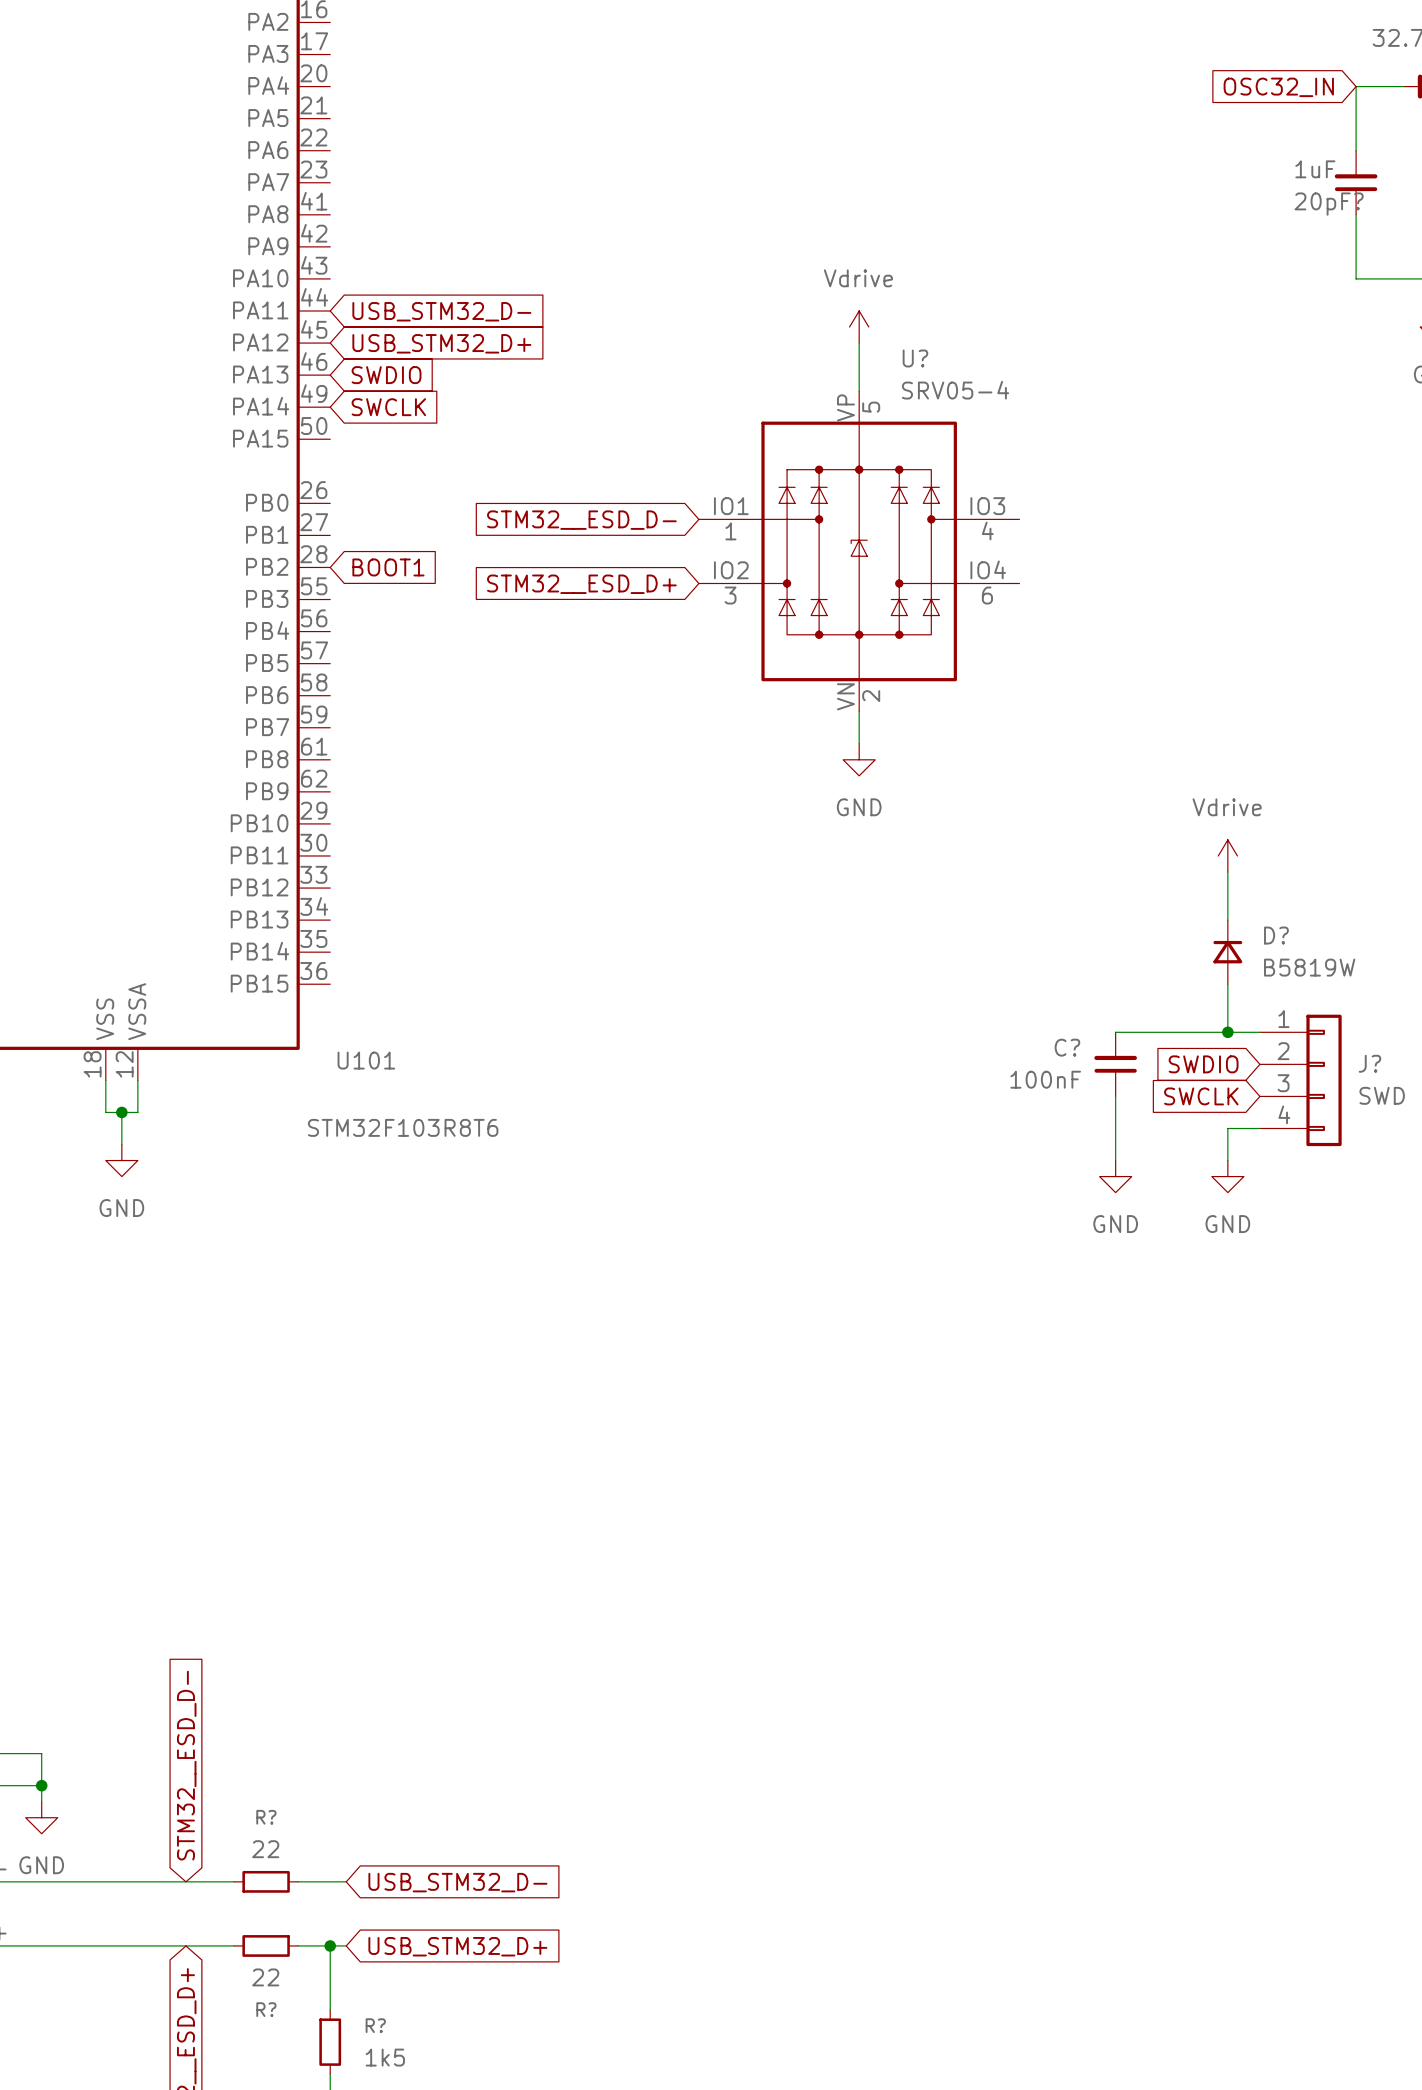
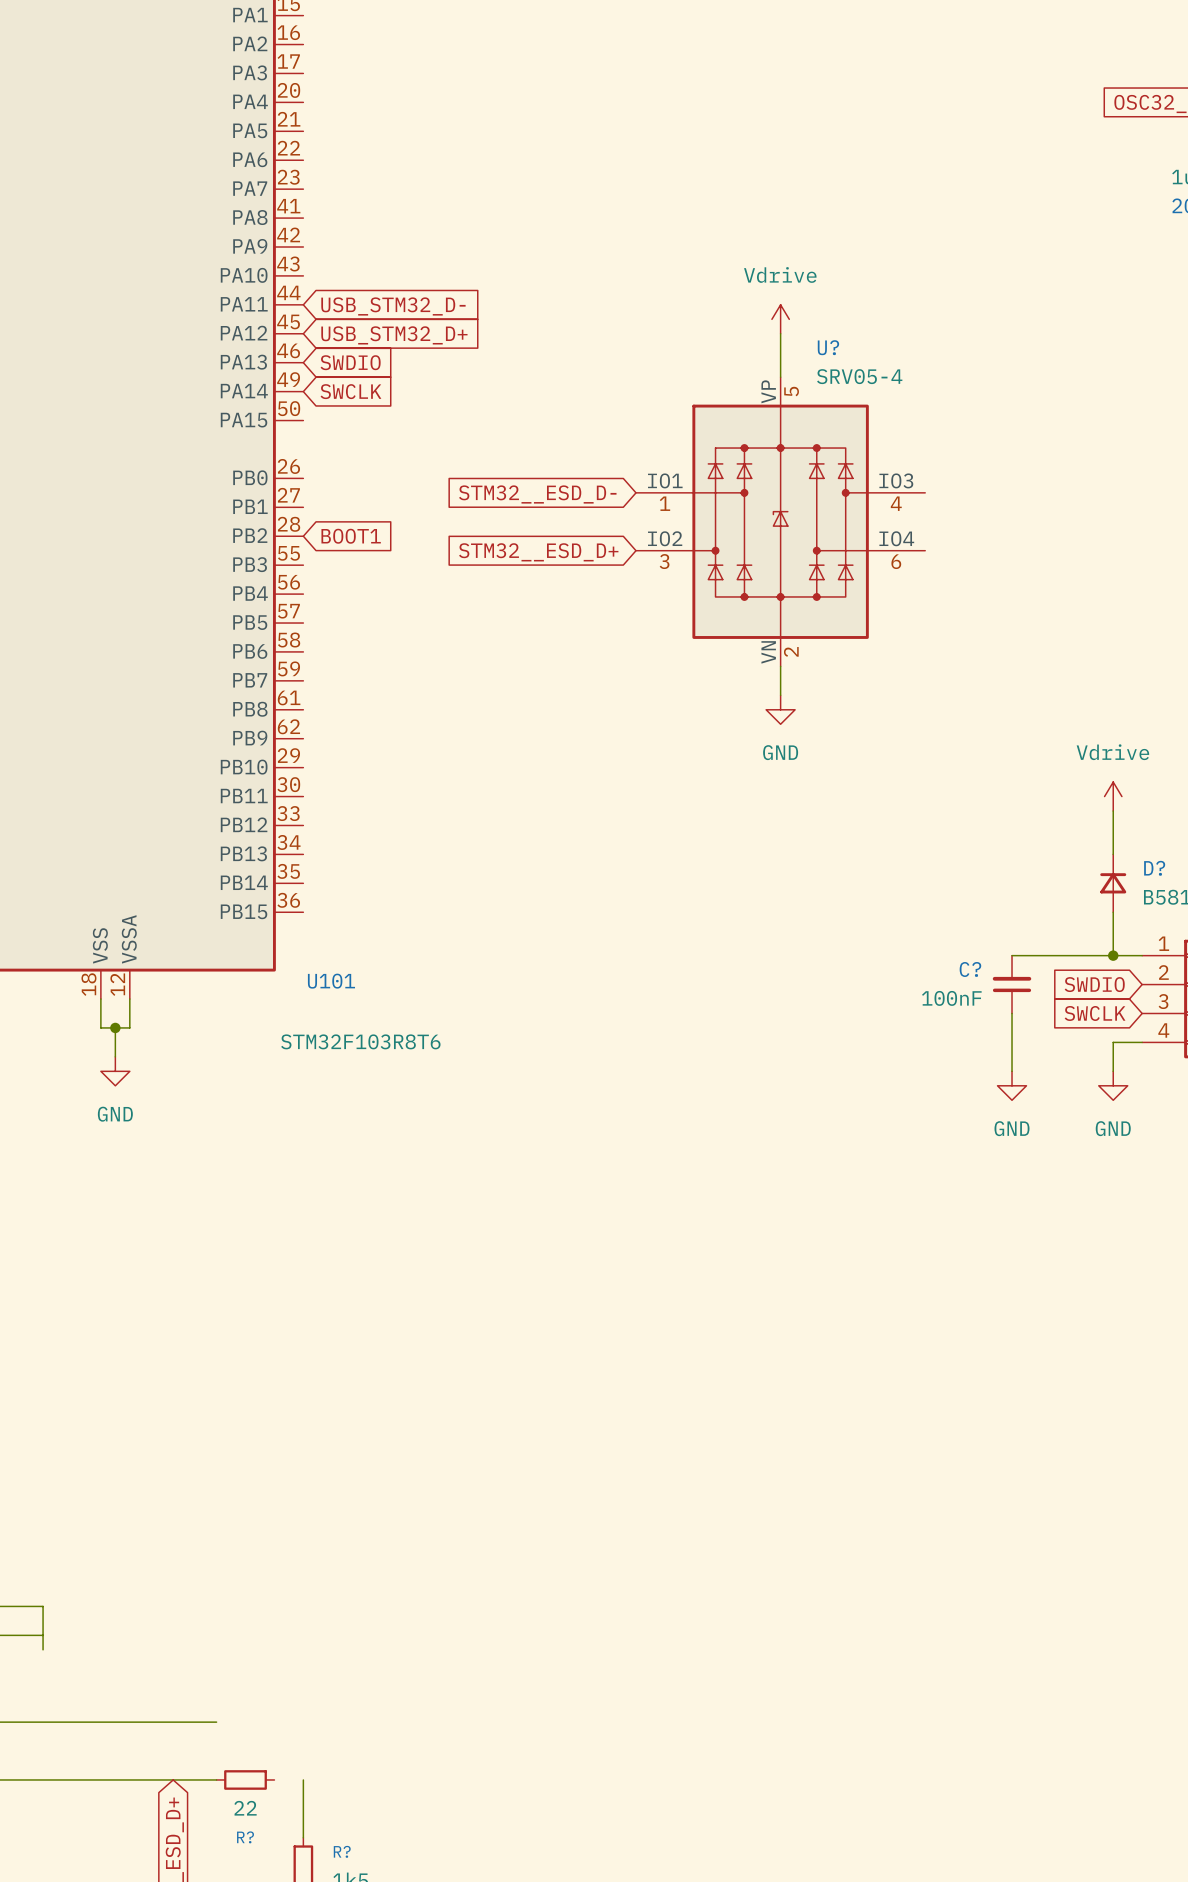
global label: STM32__ESD_D- (186, 1765) -> none
junction: (41, 1785) -> none
power symbol: GND (41, 1817) -> none
R?: 22 (266, 1881) -> none
wire: (298, 1881) (346, 1881) -> none
global label: USB_STM32_D- (457, 1882) -> none
wire: (298, 1945) (346, 1945) -> none
junction: (330, 1945) -> none
global label: USB_STM32_D+ (457, 1946) -> none

